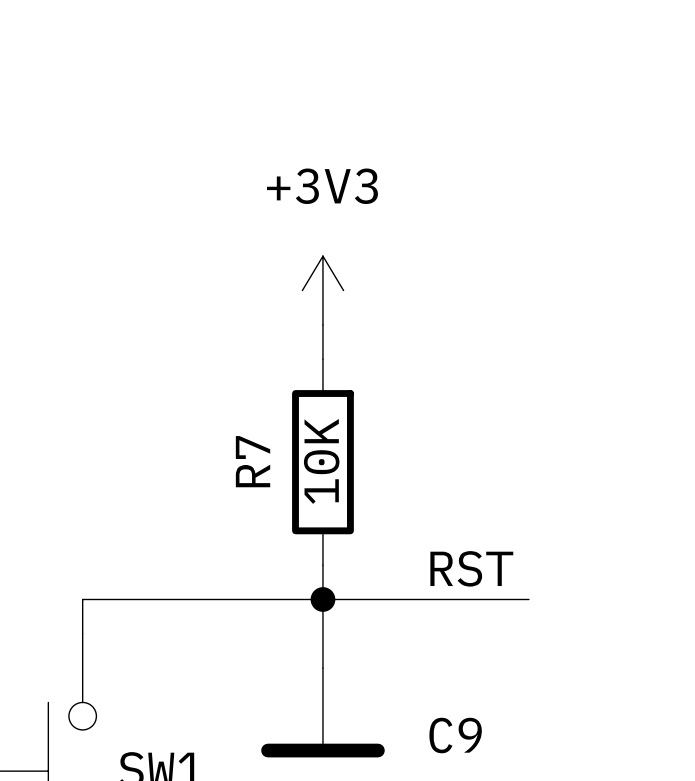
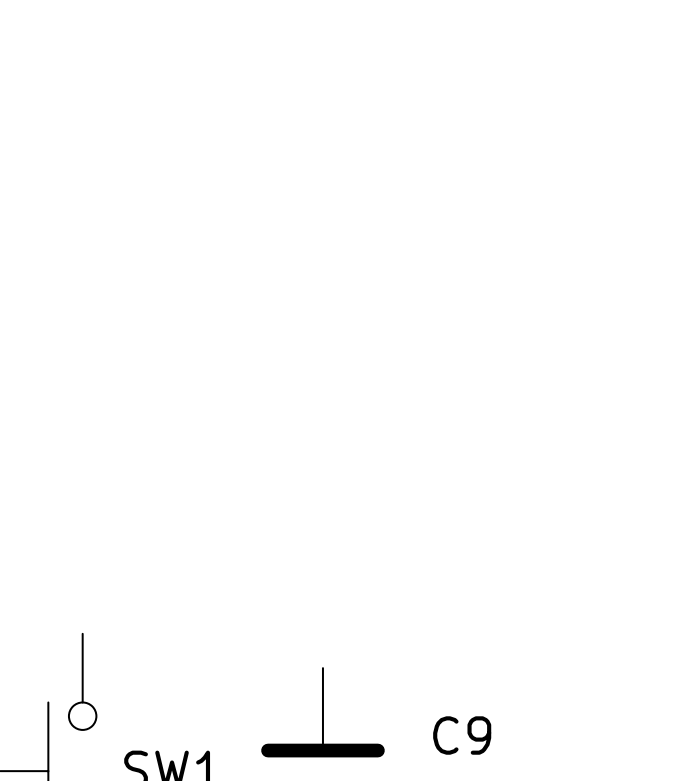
power symbol: +3V3 (322, 290) -> none
wire: (322, 324) (322, 359) -> none
R7: 10K (322, 462) -> none
wire: (322, 565) (322, 668) -> none
label: RST (471, 568) -> none
junction: (322, 599) -> none
wire: (528, 599) (82, 599) (82, 633) -> none

